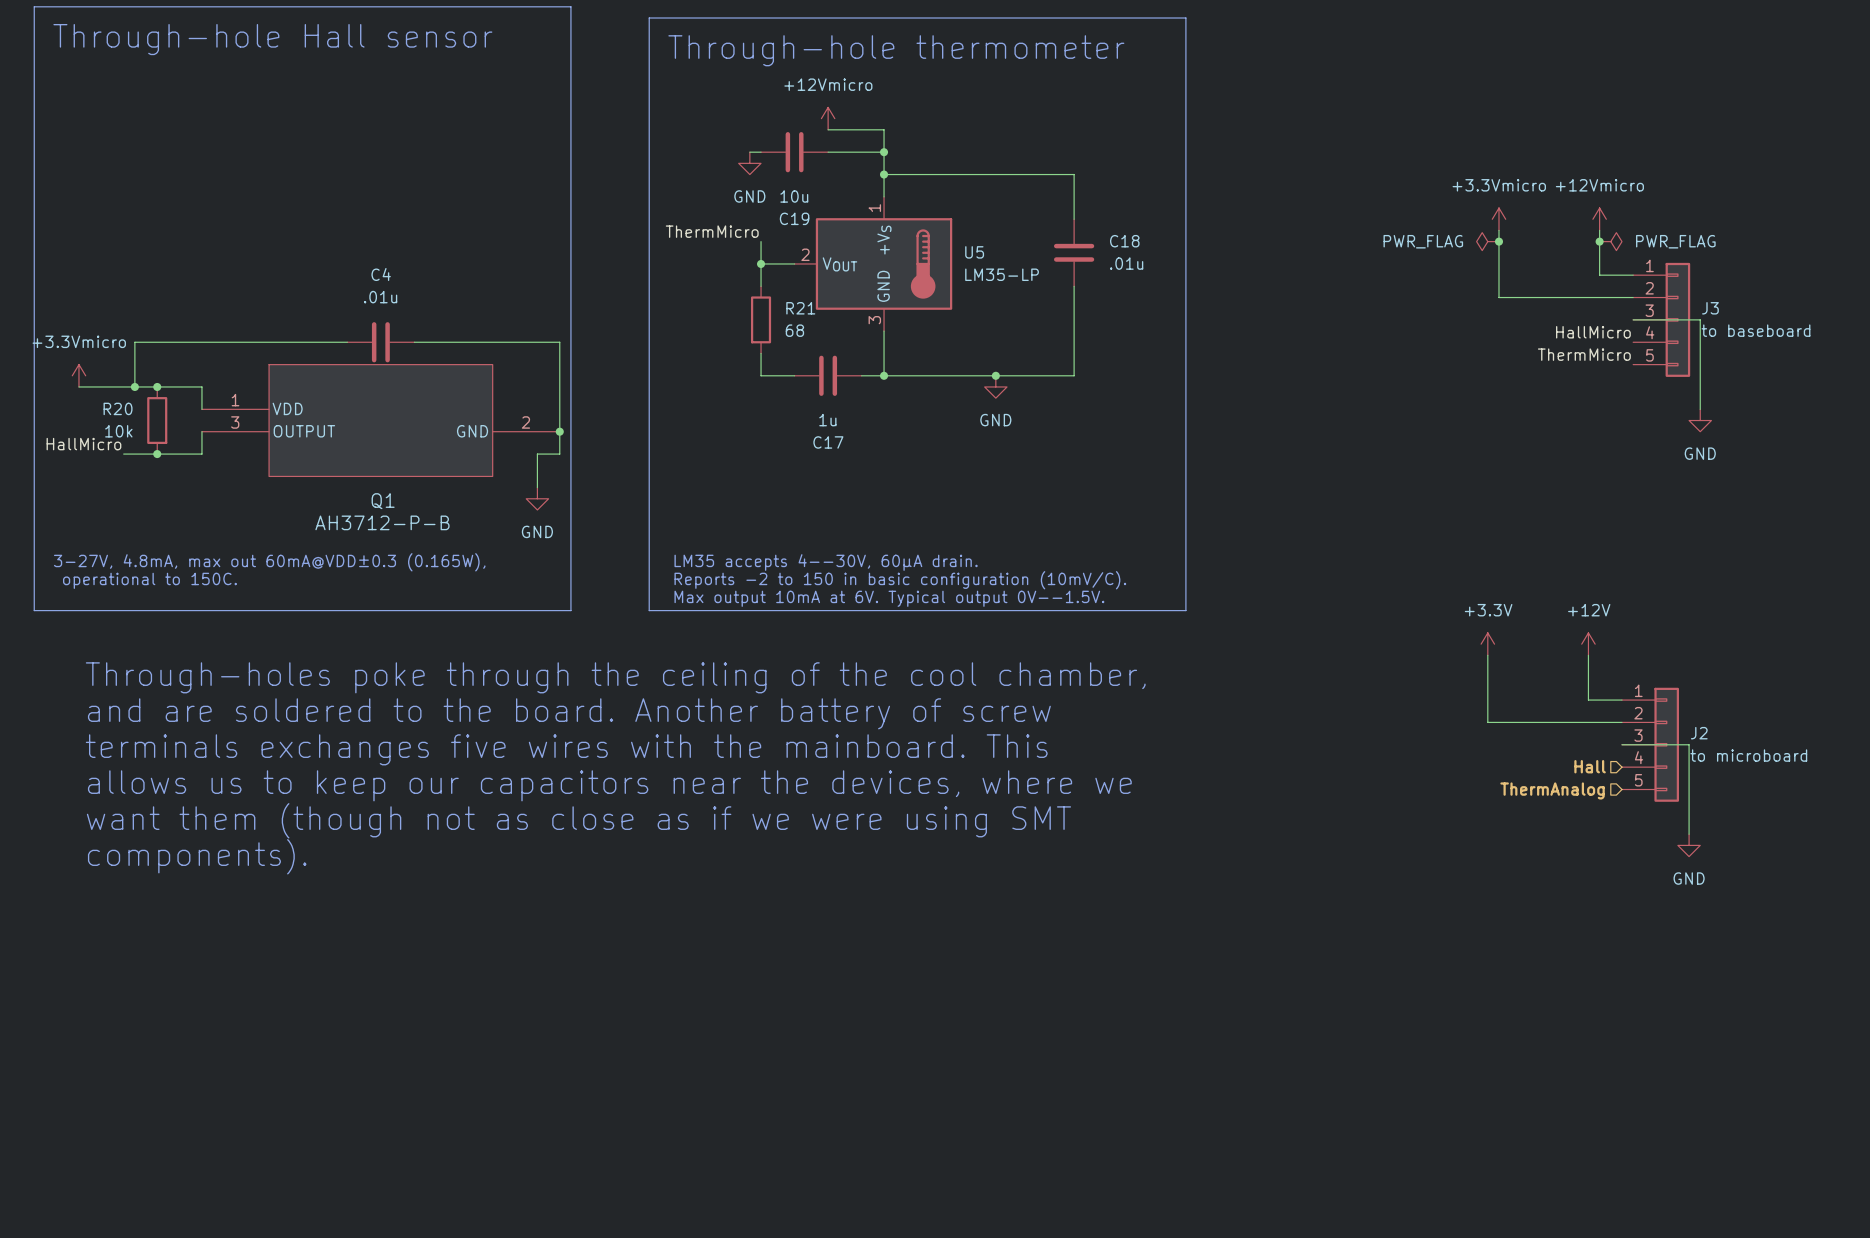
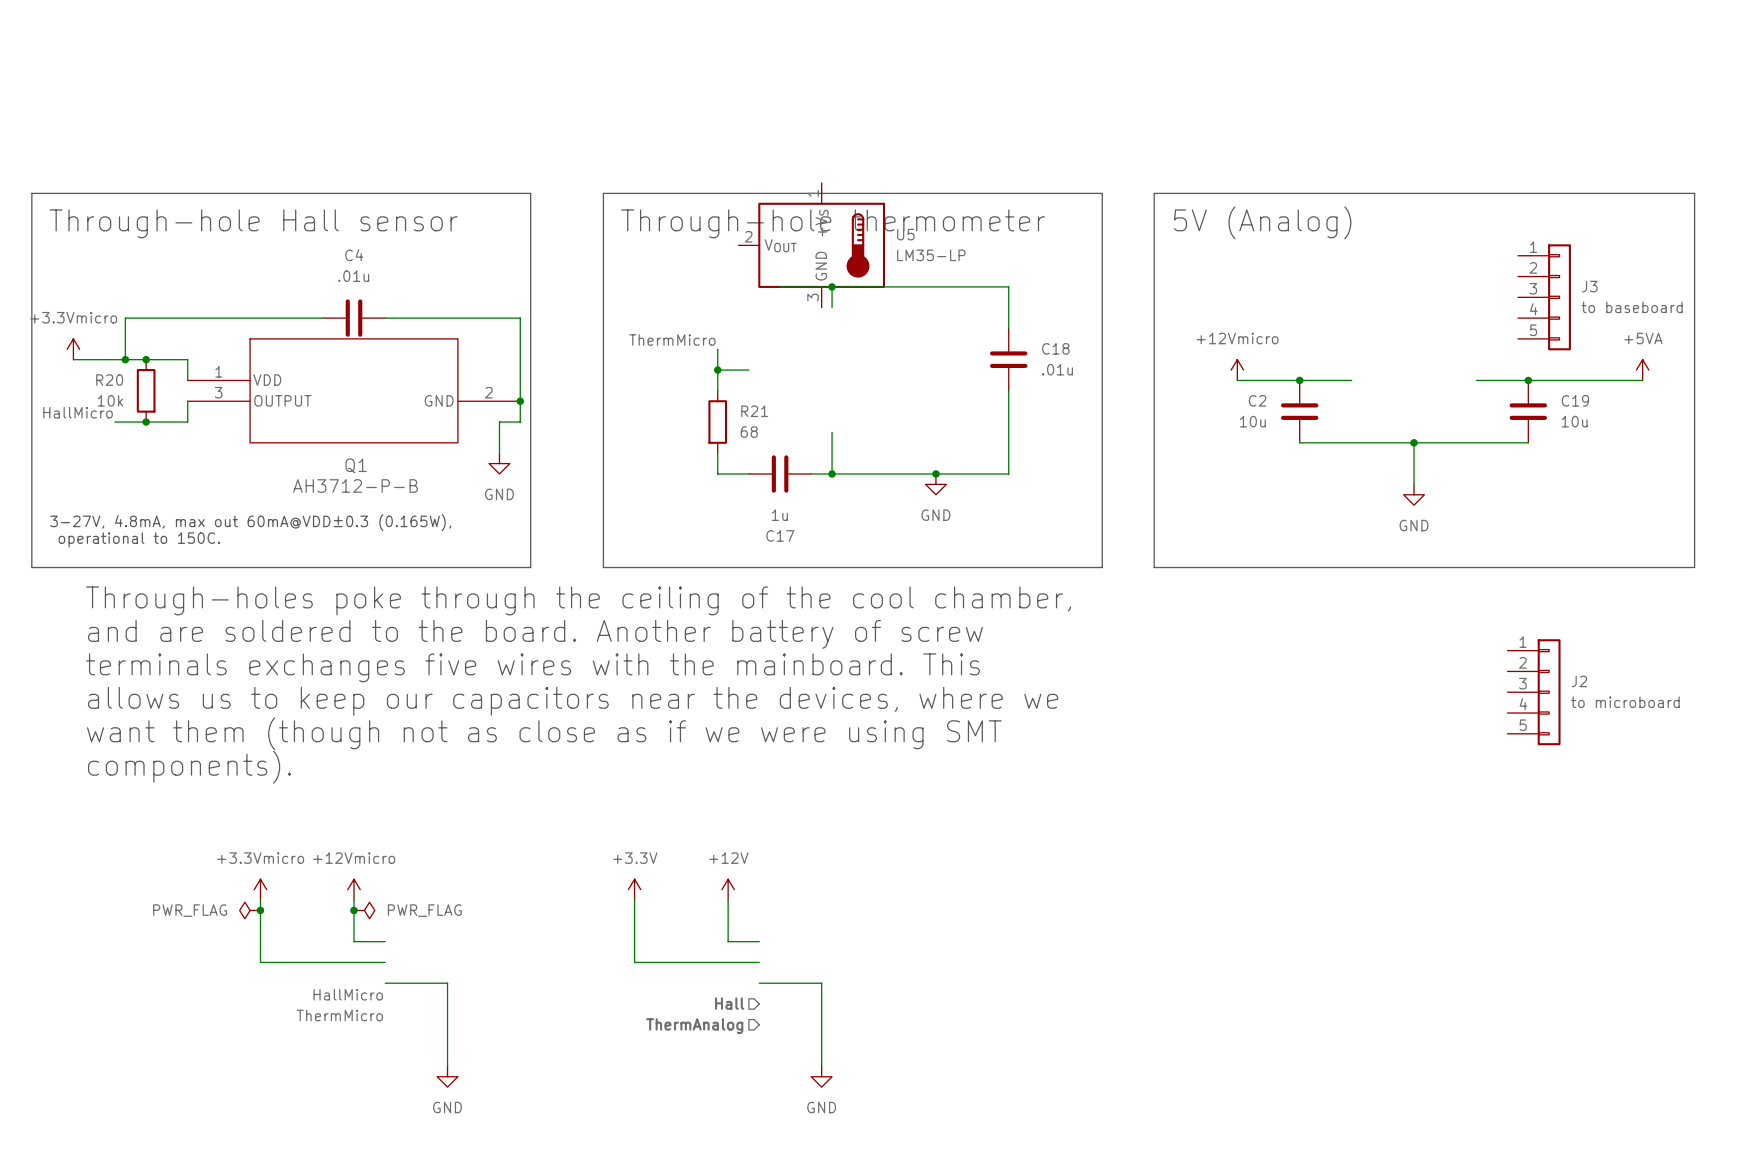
text position: Through-hole Hall sensor (272, 39) -> Through-hole Hall sensor (253, 223)
text position: Through-hole thermometer (896, 50) -> Through-hole thermometer (833, 223)
power symbol: +12Vmicro (828, 118) -> none
wire: (828, 129) (884, 129) (884, 196) -> none
wire: (749, 152) (761, 152) -> none
C19 rotation: 0° (794, 152) -> 90° clockwise (1528, 411)
C19 position: (794, 152) -> (1528, 411)
wire: (828, 152) (884, 152) -> none
junction: (884, 152) -> none
power symbol: GND (749, 163) -> none
wire: (884, 174) (1074, 174) (1074, 219) -> none
junction: (884, 174) -> none
C19 value position: 10u (794, 196) -> 10u (1574, 421)
line: (34, 208) (34, 6) (570, 6) (570, 208) -> (31, 193) (530, 193)
line: (649, 208) (649, 18) (1185, 18) (1185, 208) -> (603, 193) (1102, 193)
line: none -> (1154, 193) (1694, 193) (1694, 567) (1154, 567) (1154, 193)
C19 name position: C19 (794, 218) -> C19 (1575, 400)
power symbol: +3.3Vmicro (1498, 219) -> none
power symbol: +12Vmicro (1599, 219) -> none
wire: (1498, 230) (1498, 297) (1633, 297) -> none
wire: (1599, 230) (1599, 275) (1633, 275) -> none
label position: ThermMicro (712, 231) -> ThermMicro (672, 340)
text: none -> 5V (Analog) (1262, 222)
wire: (761, 241) (761, 286) -> (717, 349) (717, 390)
power symbol: PWR_FLAG (1487, 241) -> none
junction: (1498, 241) -> none
junction: (1599, 241) -> none
power symbol: PWR_FLAG (1610, 241) -> none
C18 position: (1074, 252) -> (1008, 359)
wire: (761, 263) (794, 263) -> (717, 370) (748, 370)
junction: (761, 263) -> none
wire: (1074, 286) (1074, 375) (861, 375) -> (1008, 390) (1008, 473) (811, 473)
wire: none -> (780, 286) (1008, 286) (1008, 328)
wire: none -> (832, 286) (832, 307)
junction: none -> (832, 286)
R21 position: (761, 319) -> (717, 422)
wire: (1633, 319) (1700, 319) (1700, 409) -> none
wire: (884, 331) (884, 375) -> (832, 432) (832, 473)
label: HallMicro (1593, 332) -> none
wire: (761, 353) (761, 375) (794, 375) -> (717, 453) (717, 473) (748, 473)
label: ThermMicro (1584, 354) -> none
C17 position: (828, 375) -> (780, 473)
junction: (884, 375) -> none
junction: (995, 375) -> none
power symbol position: GND (995, 386) -> GND (935, 484)
junction: none -> (717, 370)
power symbol: none -> +12Vmicro (1237, 370)
power symbol: none -> +5VA (1642, 370)
wire: none -> (1237, 380) (1351, 380)
junction: none -> (1299, 380)
wire: none -> (1476, 380) (1642, 380)
junction: none -> (1528, 380)
power symbol: GND (1700, 420) -> none
C2: none -> 10u (1299, 411)
wire: none -> (1299, 442) (1528, 442)
wire: none -> (1414, 442) (1414, 484)
junction: none -> (1414, 442)
junction: none -> (832, 473)
junction: none -> (935, 473)
power symbol: none -> GND (1414, 494)
text: LM35 accepts 4--30V, 60µA drain. (826, 562) -> none
text: Reports -2 to 150 in basic configuration (10mV/C). (900, 580) -> none
text: Max output 10mA at 6V. Typical output 0V--1.5V. (889, 598) -> none
power symbol: +3.3V (1487, 644) -> none
power symbol: +12V (1588, 644) -> none
wire: (1487, 655) (1487, 722) (1621, 722) -> none
wire: (1588, 655) (1588, 700) (1621, 700) -> none
text position: Through-holes poke through the ceiling of the cool chamber, (615, 677) -> Through-holes poke through the ceiling of the cool chamber, (578, 600)
text position: and are soldered to the board. Another battery of screw (569, 713) -> and are soldered to the board. Another battery of screw (535, 634)
wire: (1621, 744) (1689, 744) (1689, 834) -> none
text position: terminals exchanges five wires with the mainboard. This (566, 749) -> terminals exchanges five wires with the mainboard. This (532, 667)
hierarchical label: Hall (1590, 766) -> none
text position: allows us to keep our capacitors near the devices, where we (609, 785) -> allows us to keep our capacitors near the devices, where we (573, 701)
hierarchical label: ThermAnalog (1552, 790) -> none
text position: want them (though not as close as if we were using SMT (578, 820) -> want them (though not as close as if we were using SMT (544, 733)
power symbol: GND (1689, 845) -> none
text position: components). (197, 856) -> components). (189, 767)
power symbol: none -> +3.3Vmicro (260, 889)
power symbol: none -> +12Vmicro (354, 889)
power symbol: none -> +3.3V (634, 889)
power symbol: none -> +12V (728, 889)
wire: none -> (260, 900) (260, 962) (385, 962)
wire: none -> (354, 900) (354, 941) (385, 941)
wire: none -> (634, 900) (634, 962) (759, 962)
wire: none -> (728, 900) (728, 941) (759, 941)
power symbol: none -> PWR_FLAG (250, 910)
junction: none -> (260, 910)
junction: none -> (354, 910)
power symbol: none -> PWR_FLAG (364, 910)
wire: none -> (385, 983) (447, 983) (447, 1066)
wire: none -> (759, 983) (821, 983) (821, 1066)
label: none -> HallMicro (348, 994)
hierarchical label: none -> Hall (729, 1003)
label: none -> ThermMicro (339, 1015)
hierarchical label: none -> ThermAnalog (694, 1026)
power symbol: none -> GND (447, 1076)
power symbol: none -> GND (821, 1076)

